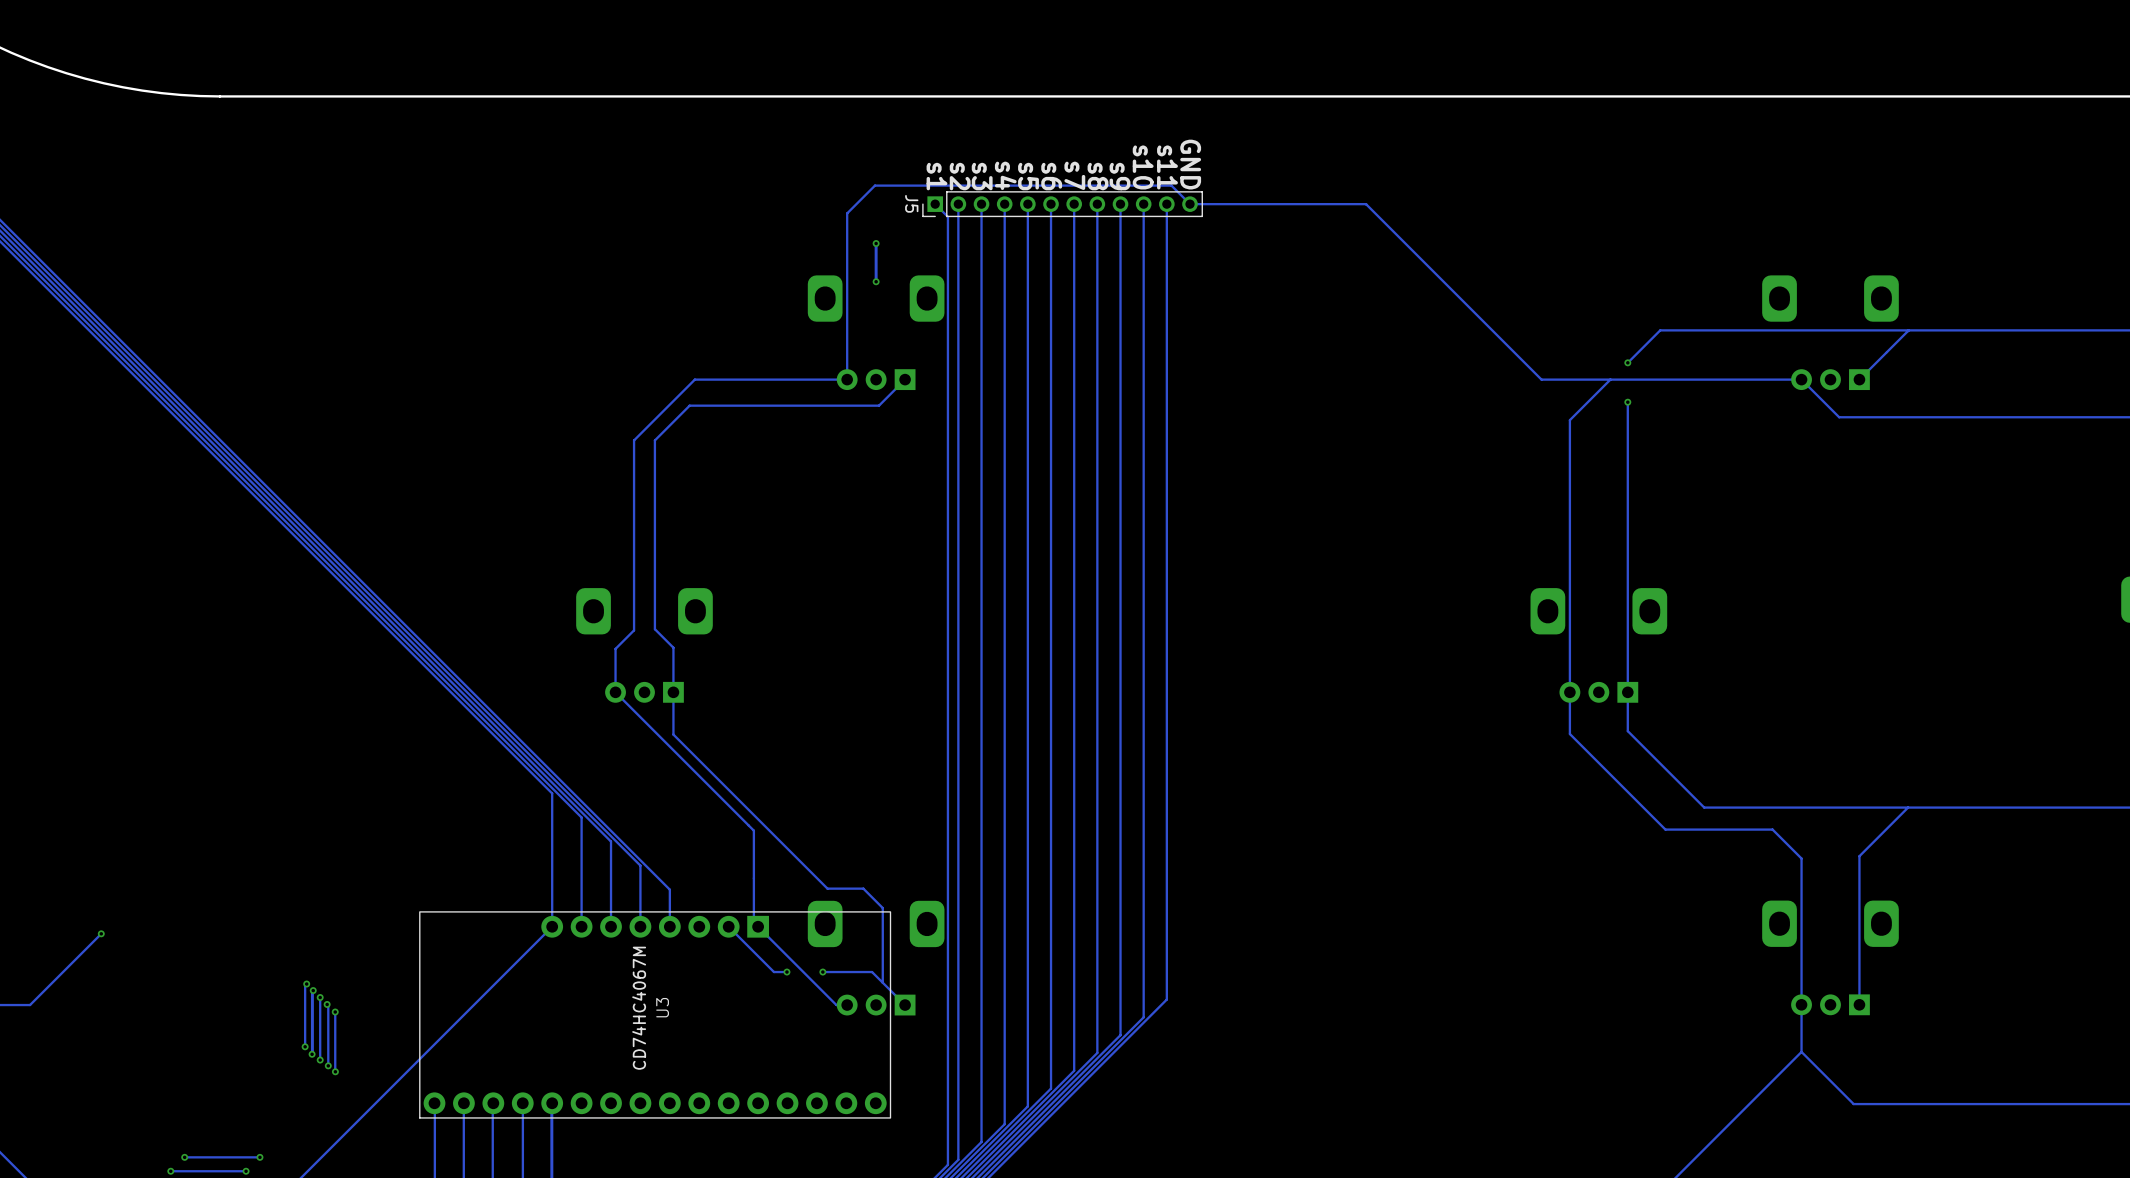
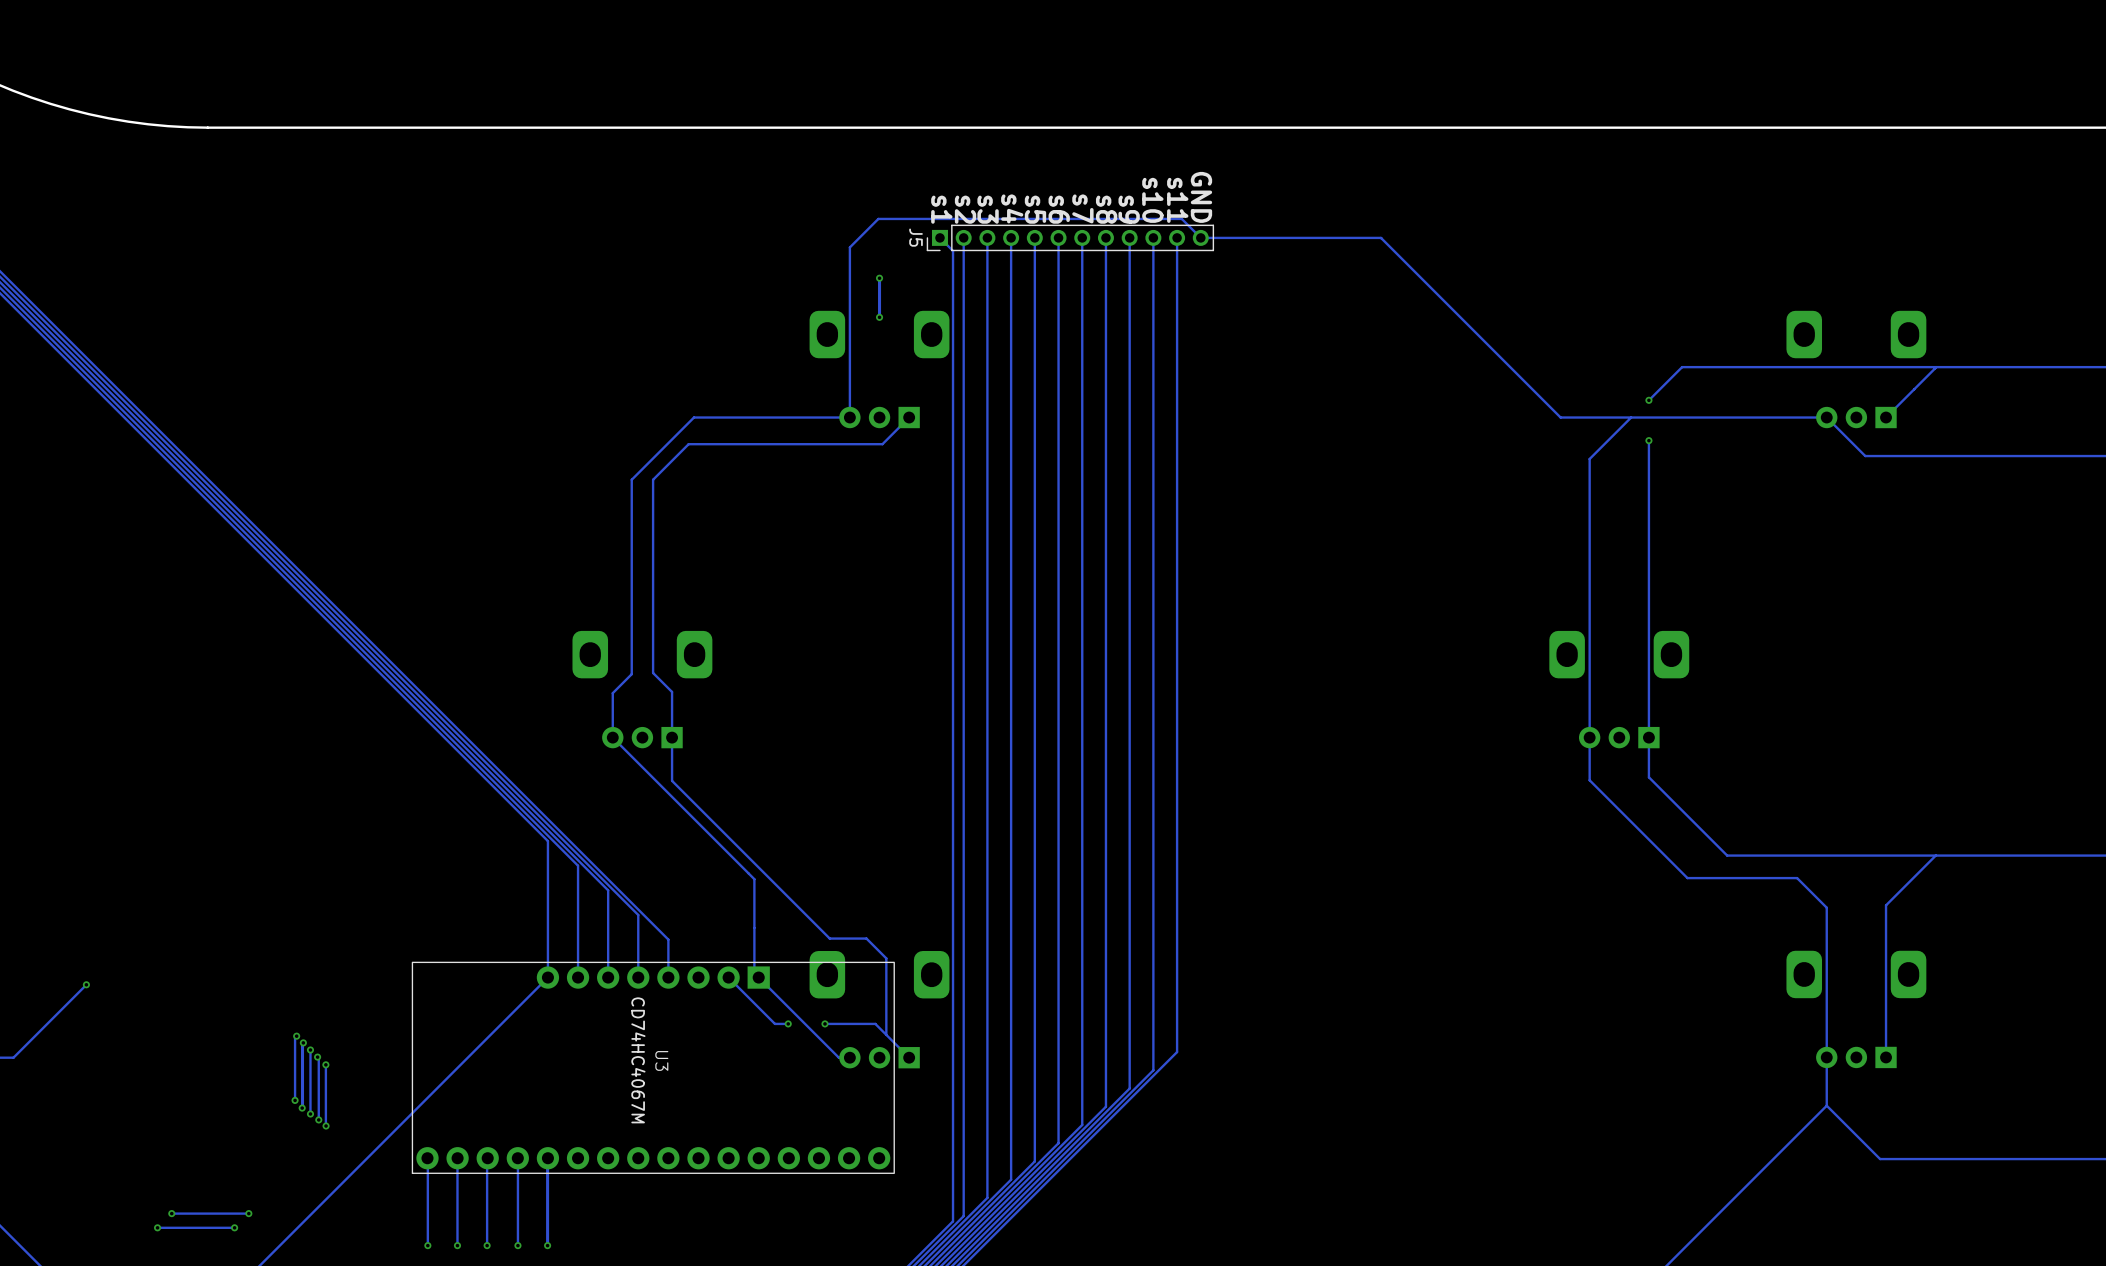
U3 name rotation: 0° (662, 1007) -> 180° (661, 1060)
U3 value rotation: 0° (639, 1008) -> 180° (638, 1060)

